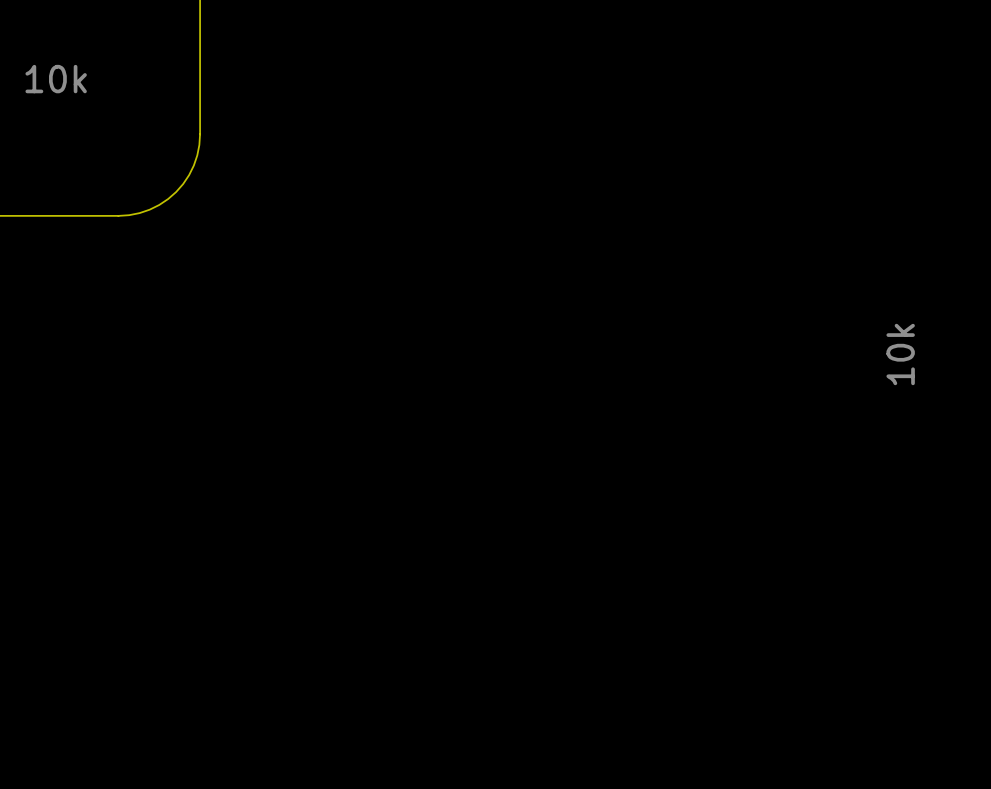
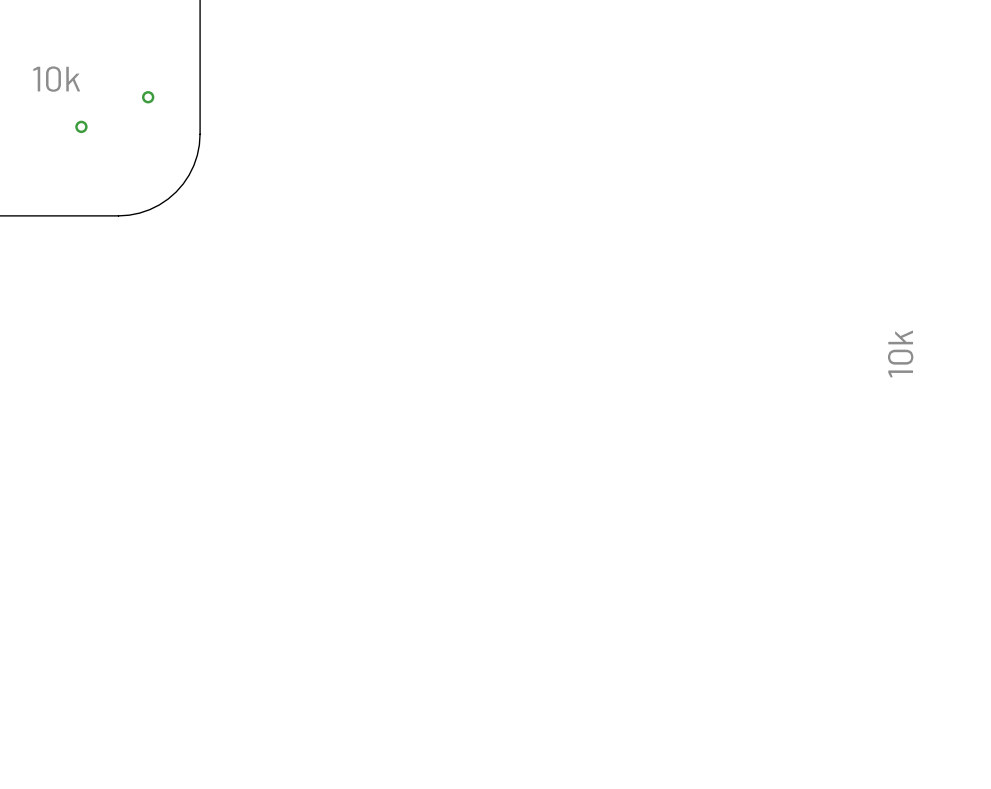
via: none -> (148, 97)
via: none -> (81, 126)

